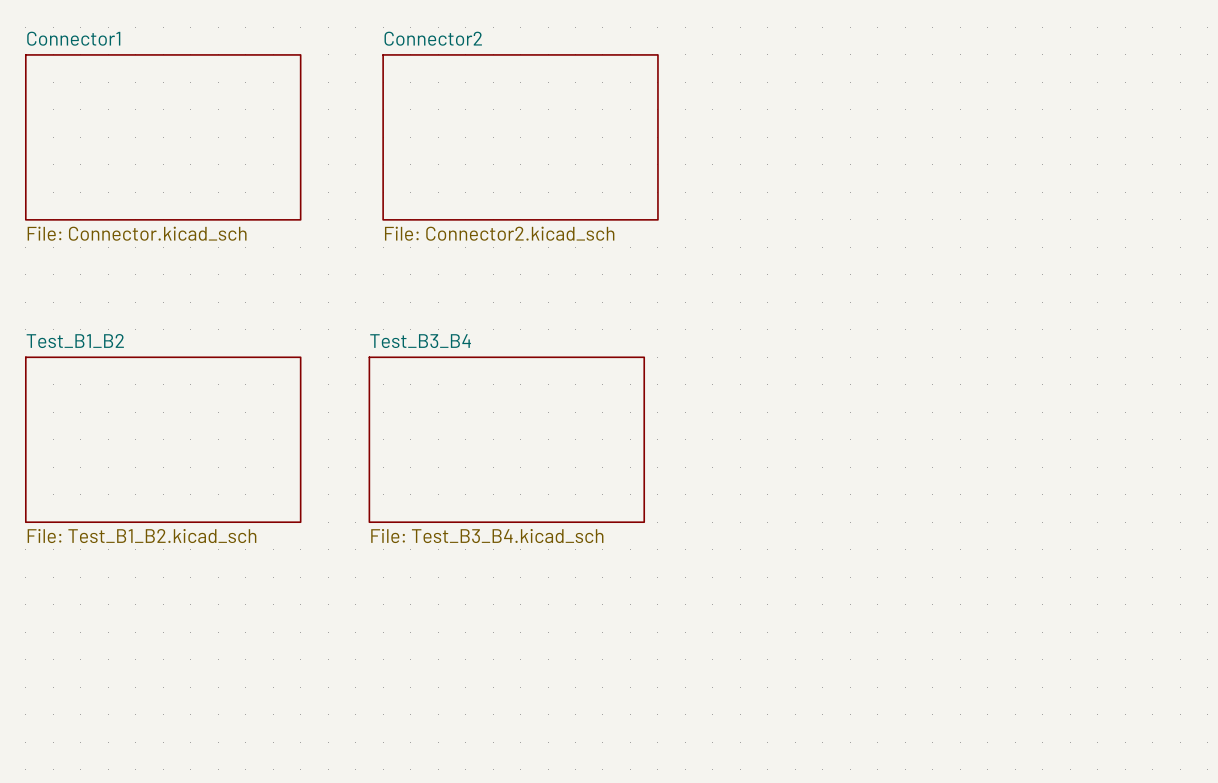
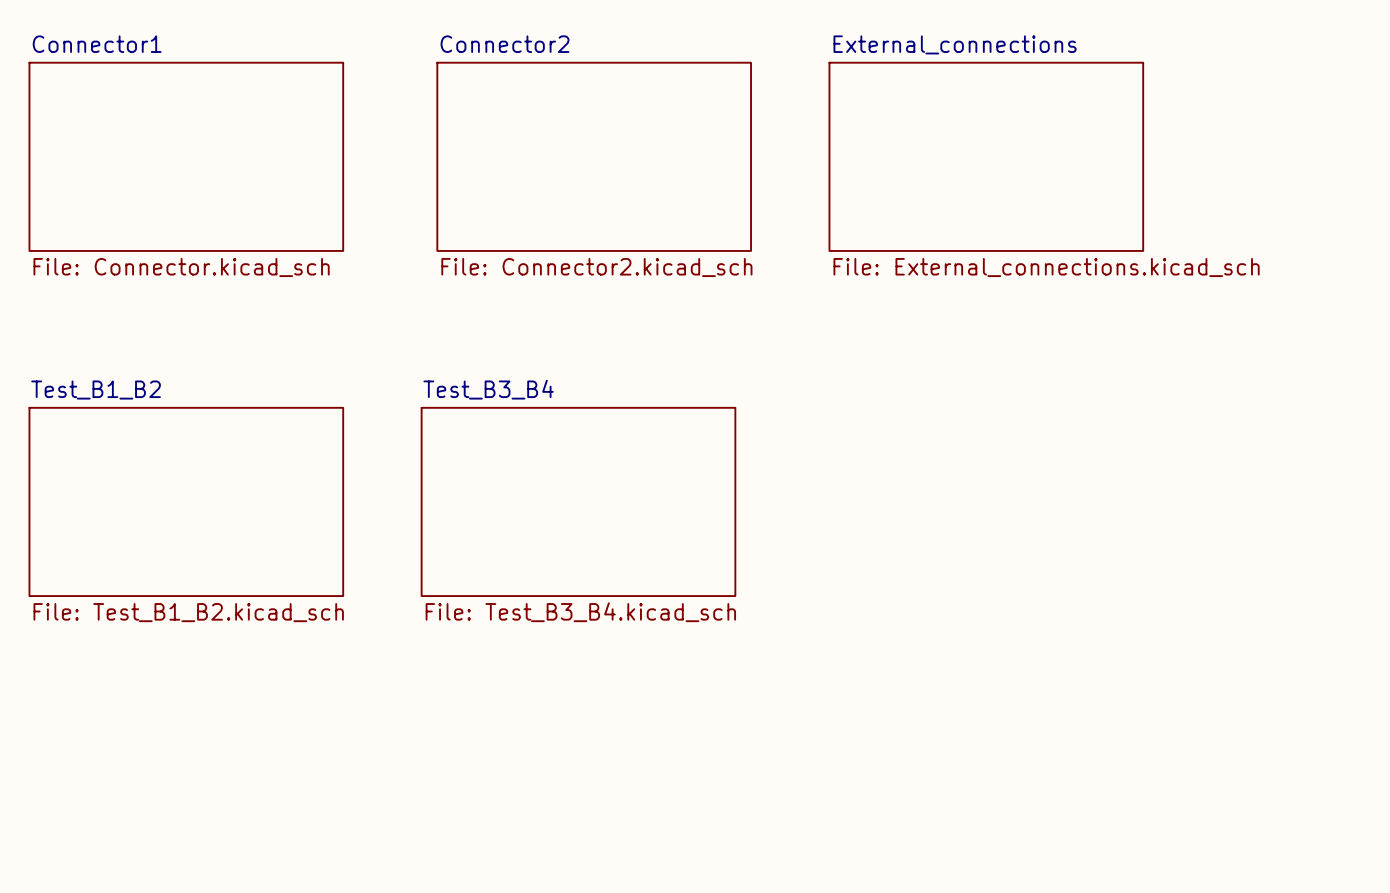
sheet External_connections: none -> File: External_connections.kicad_sch (986, 156)

